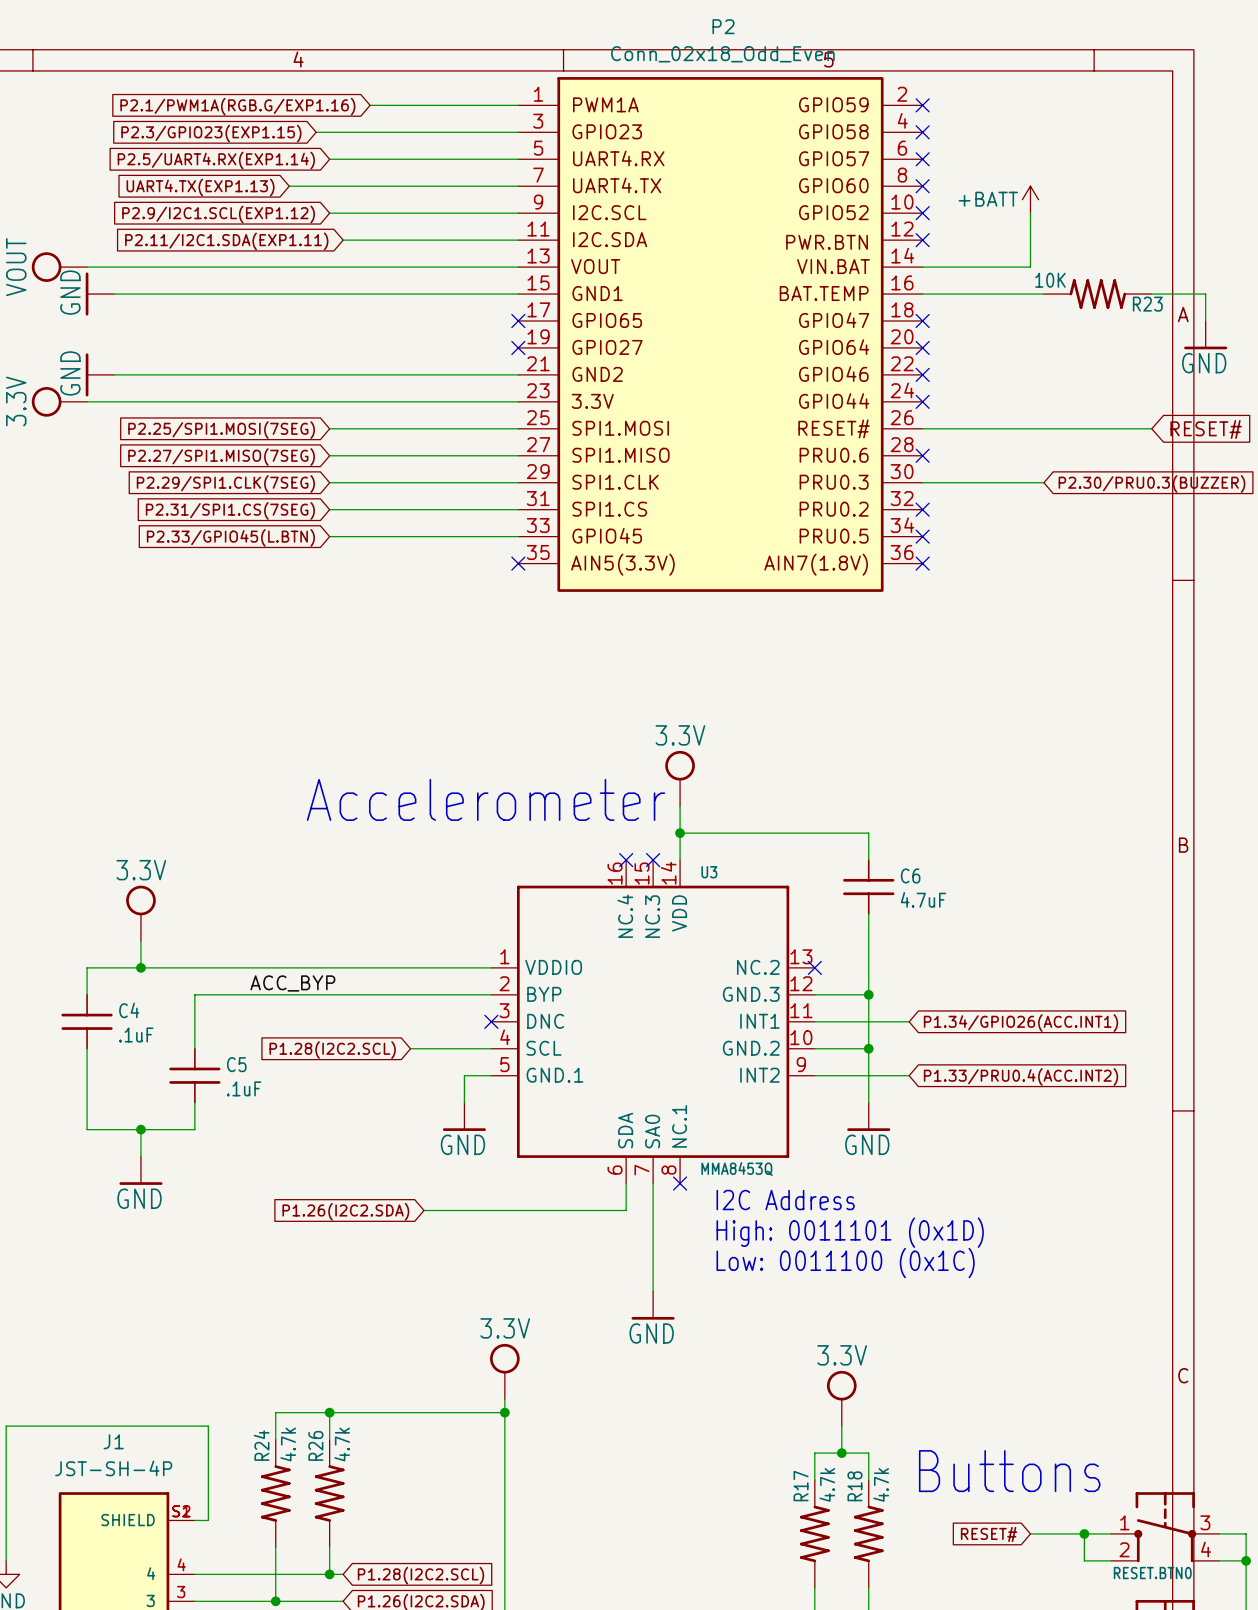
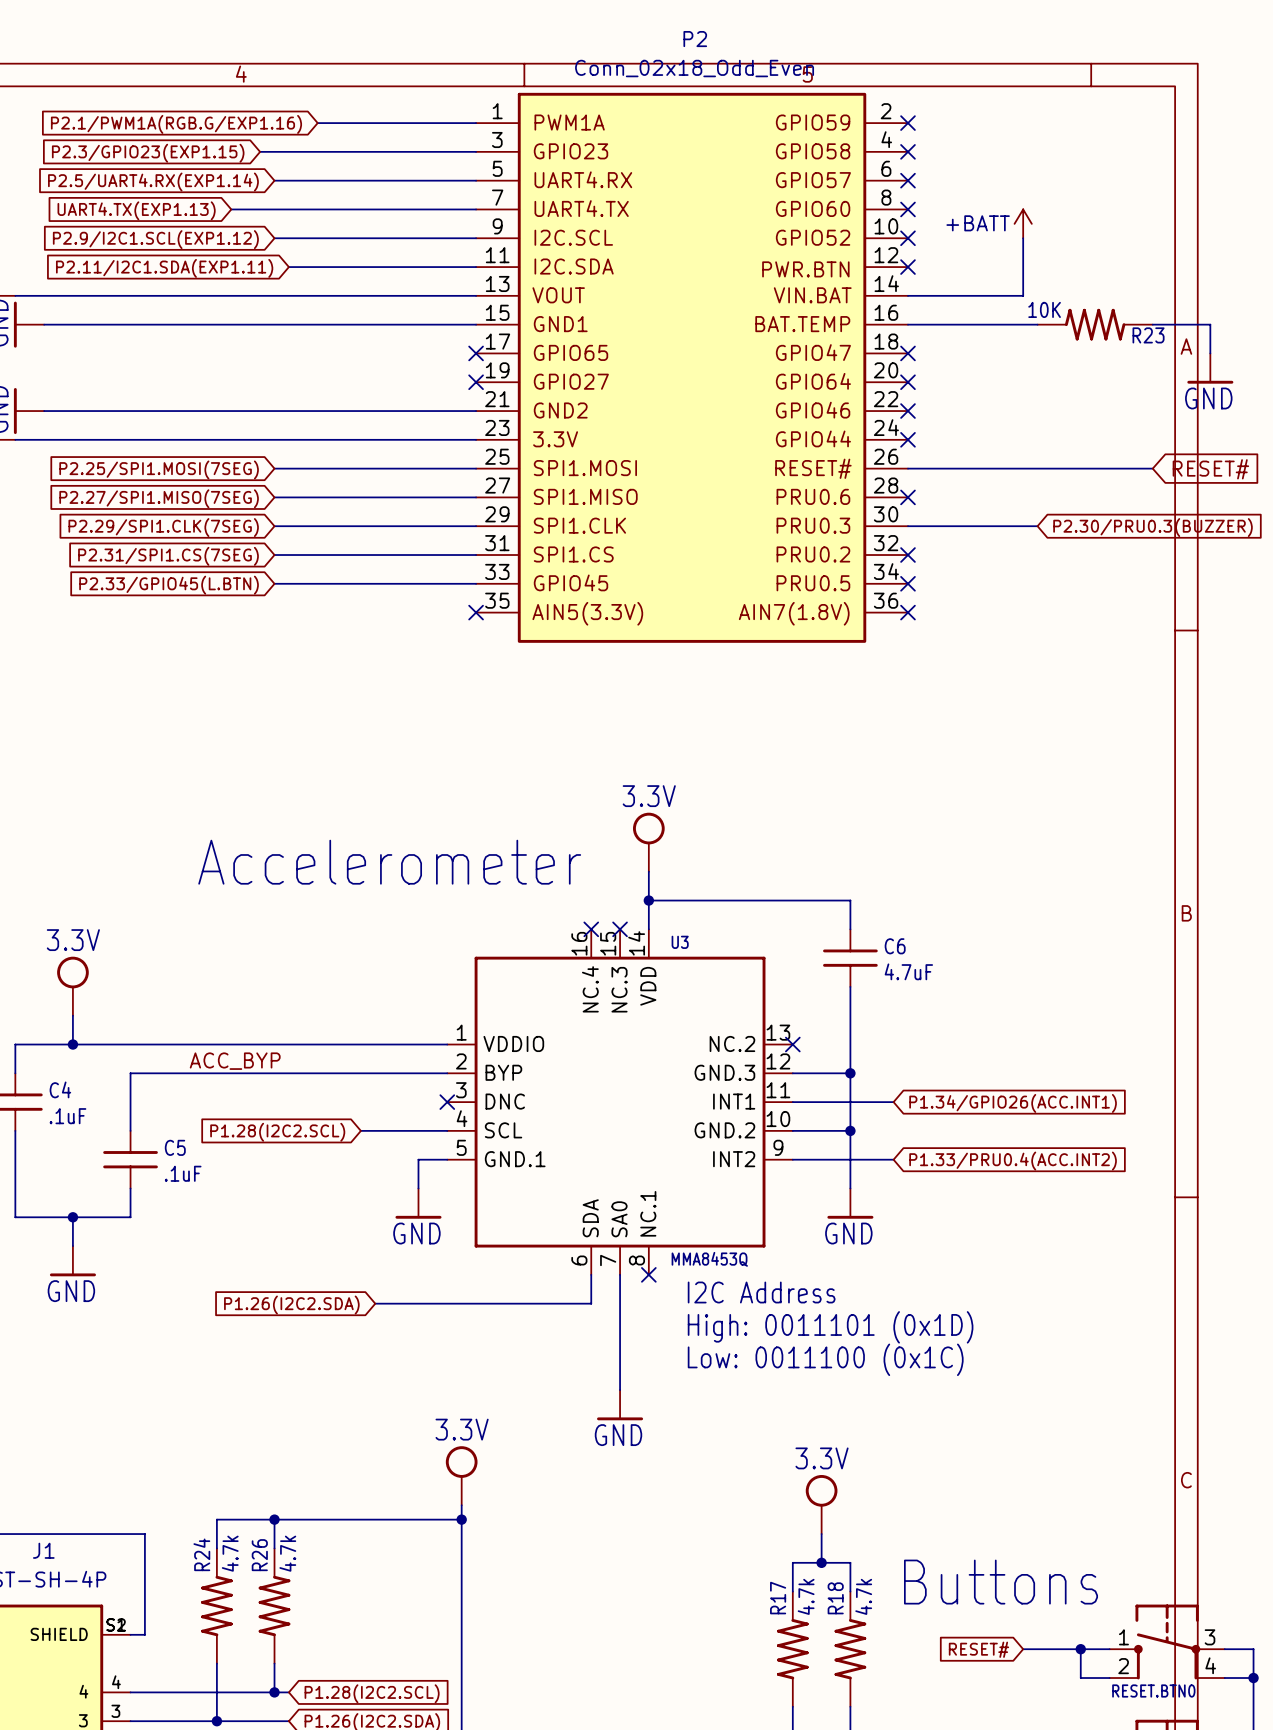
text position: Accelerometer (485, 799) -> Accelerometer (389, 862)

